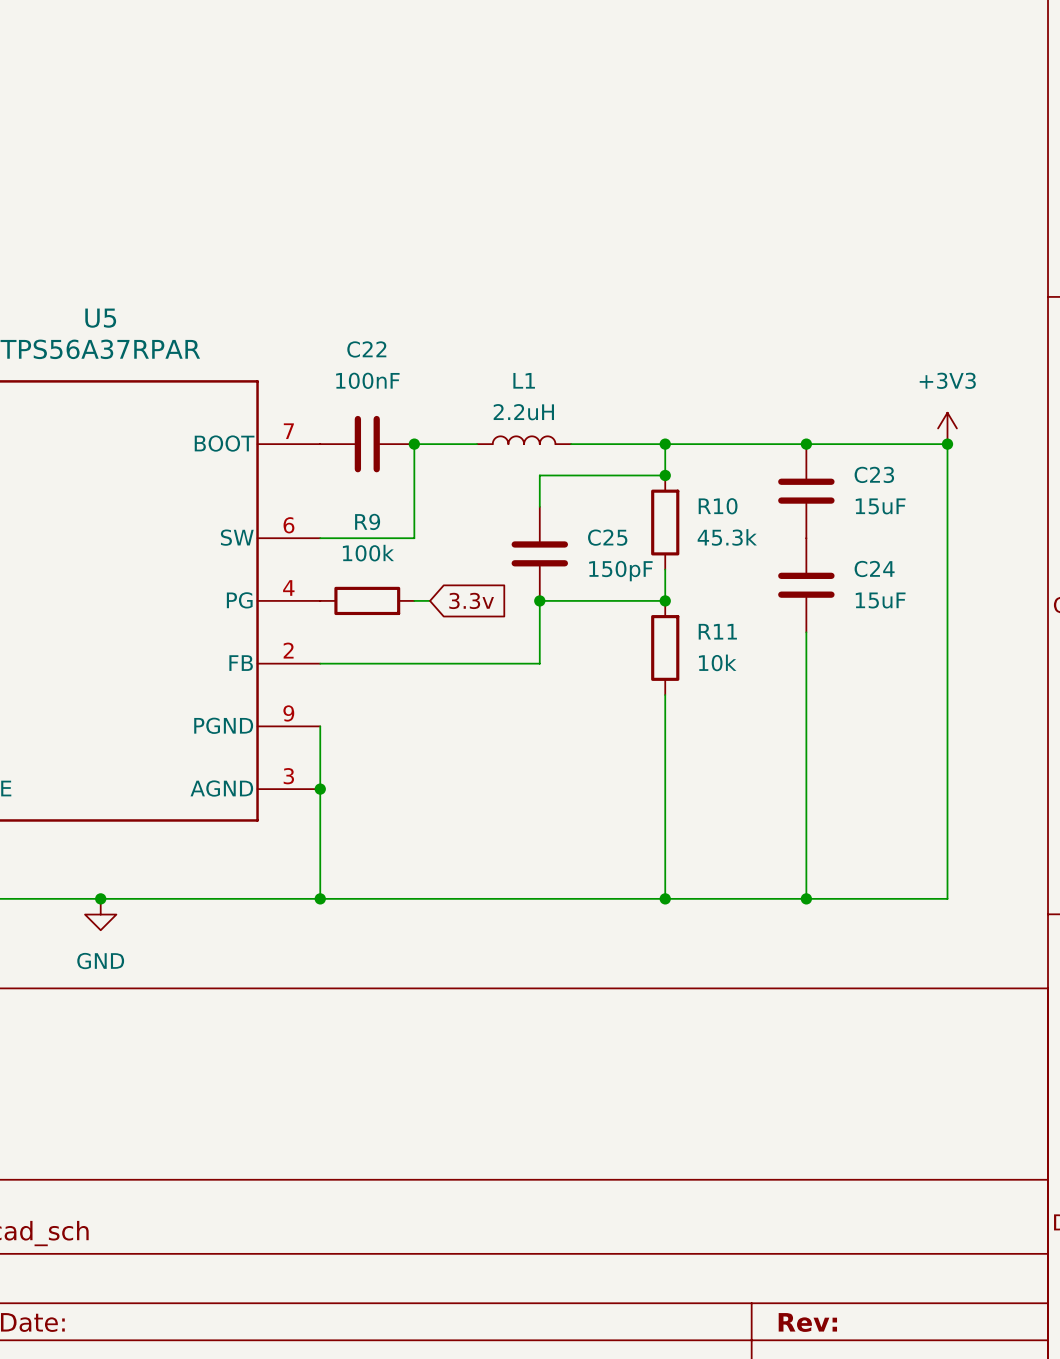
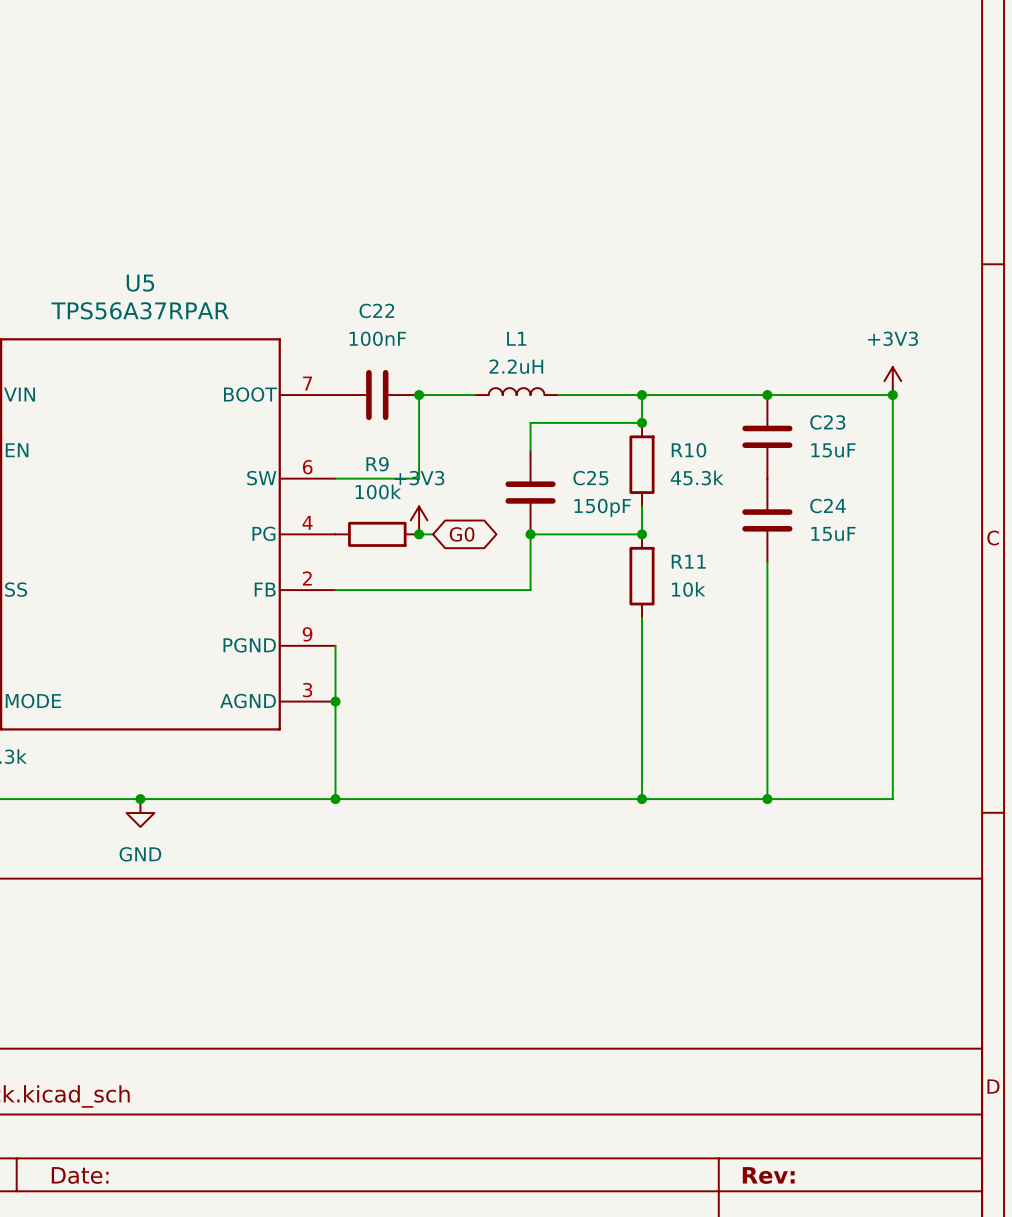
power symbol: none -> +3V3 (419, 520)
junction: none -> (419, 534)
global label shape: input (471, 600) -> bidirectional (462, 534)
global label: 3.3v (471, 600) -> G0 (462, 534)

